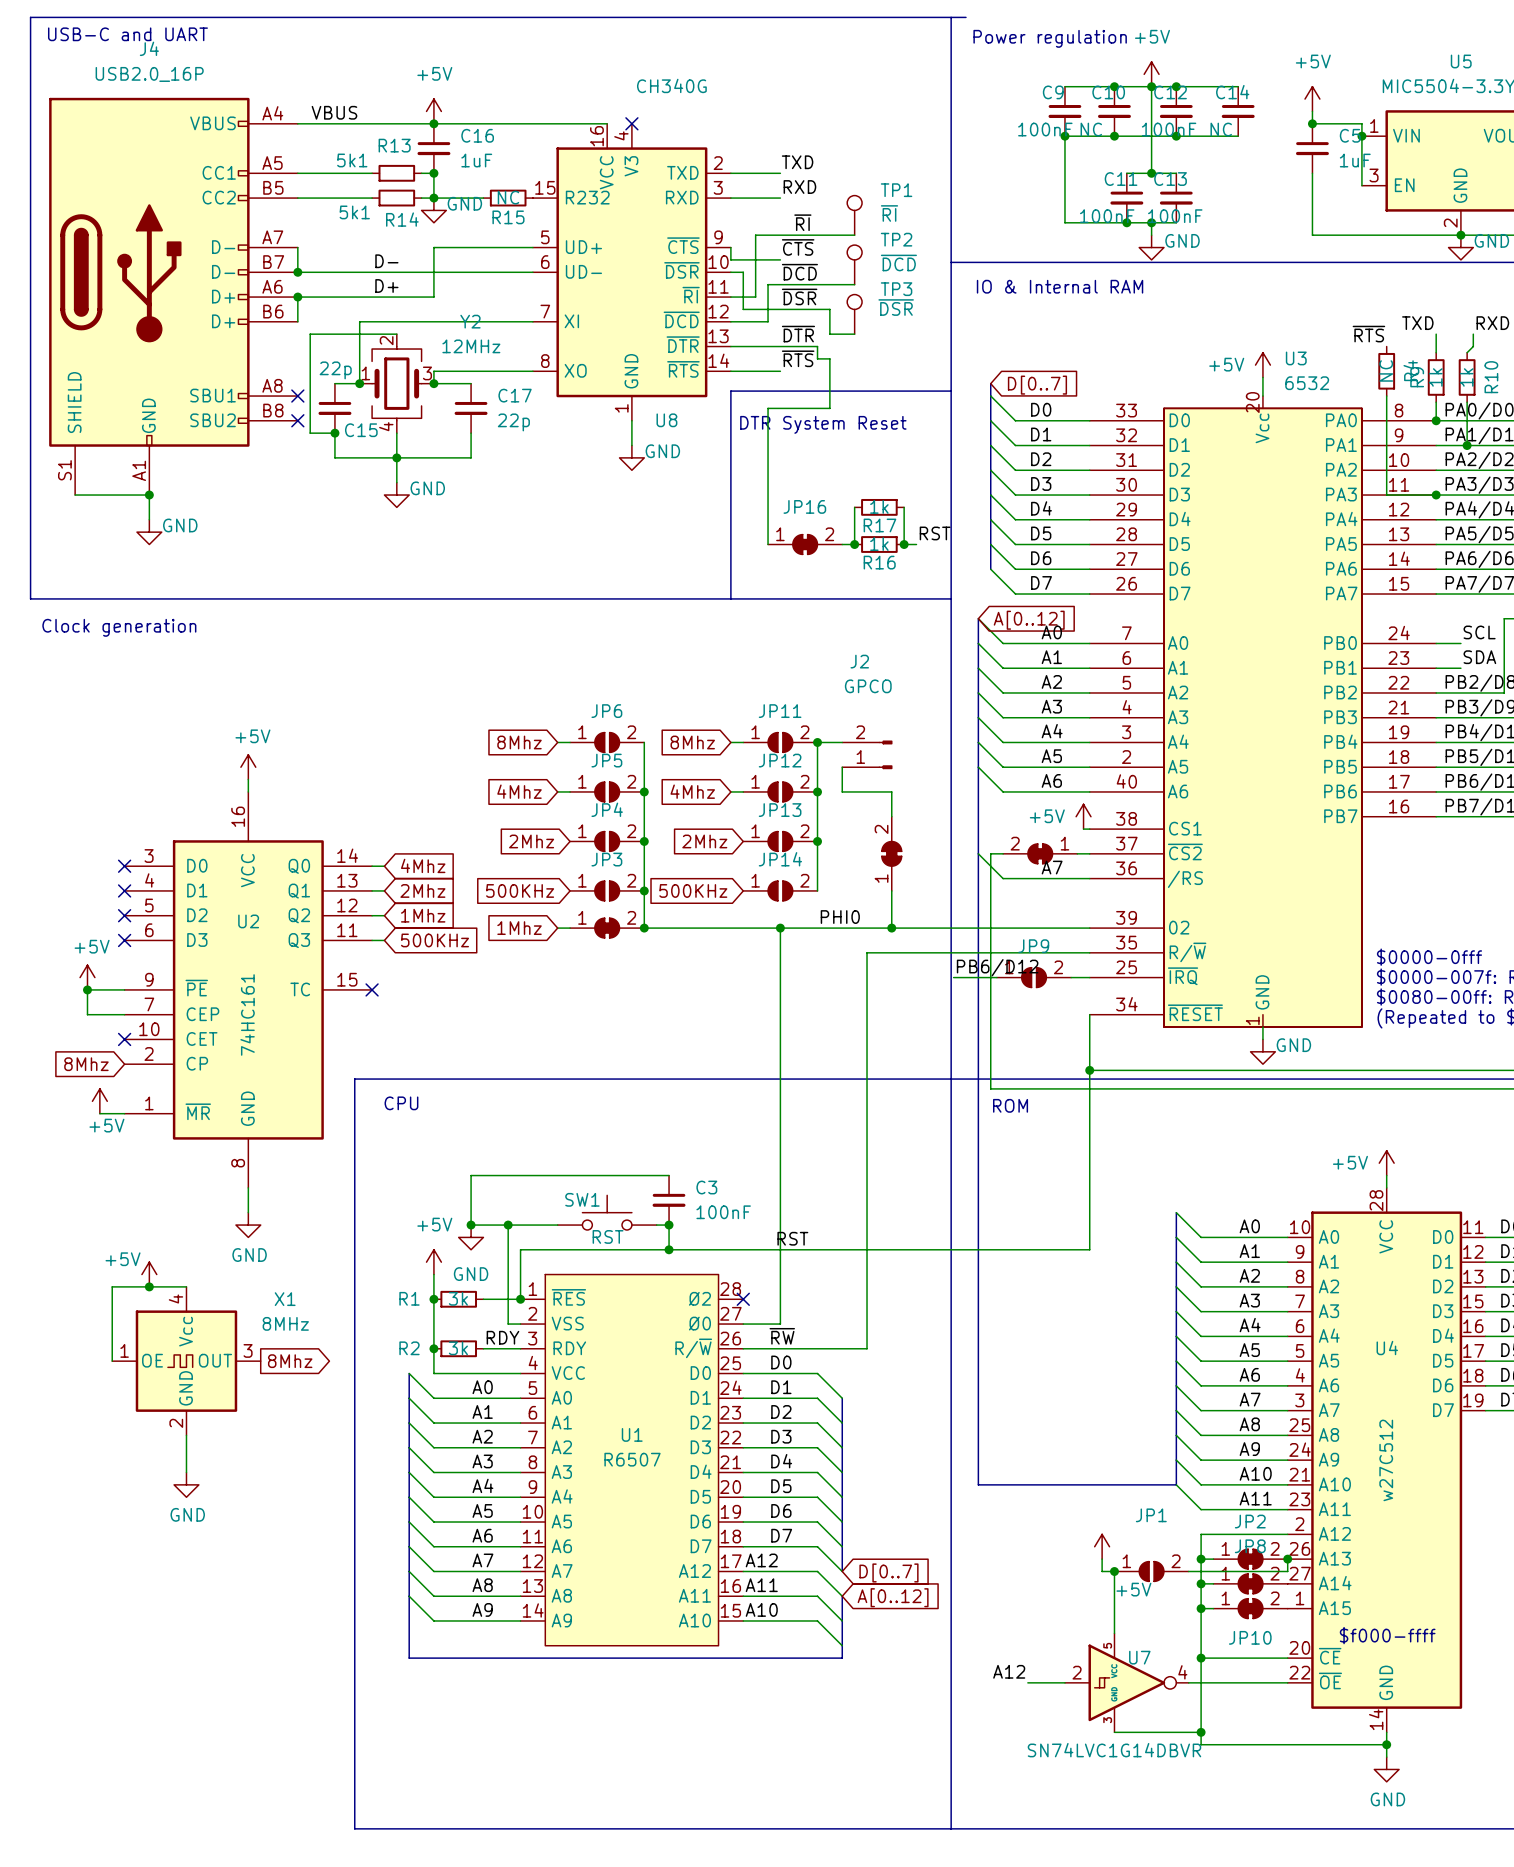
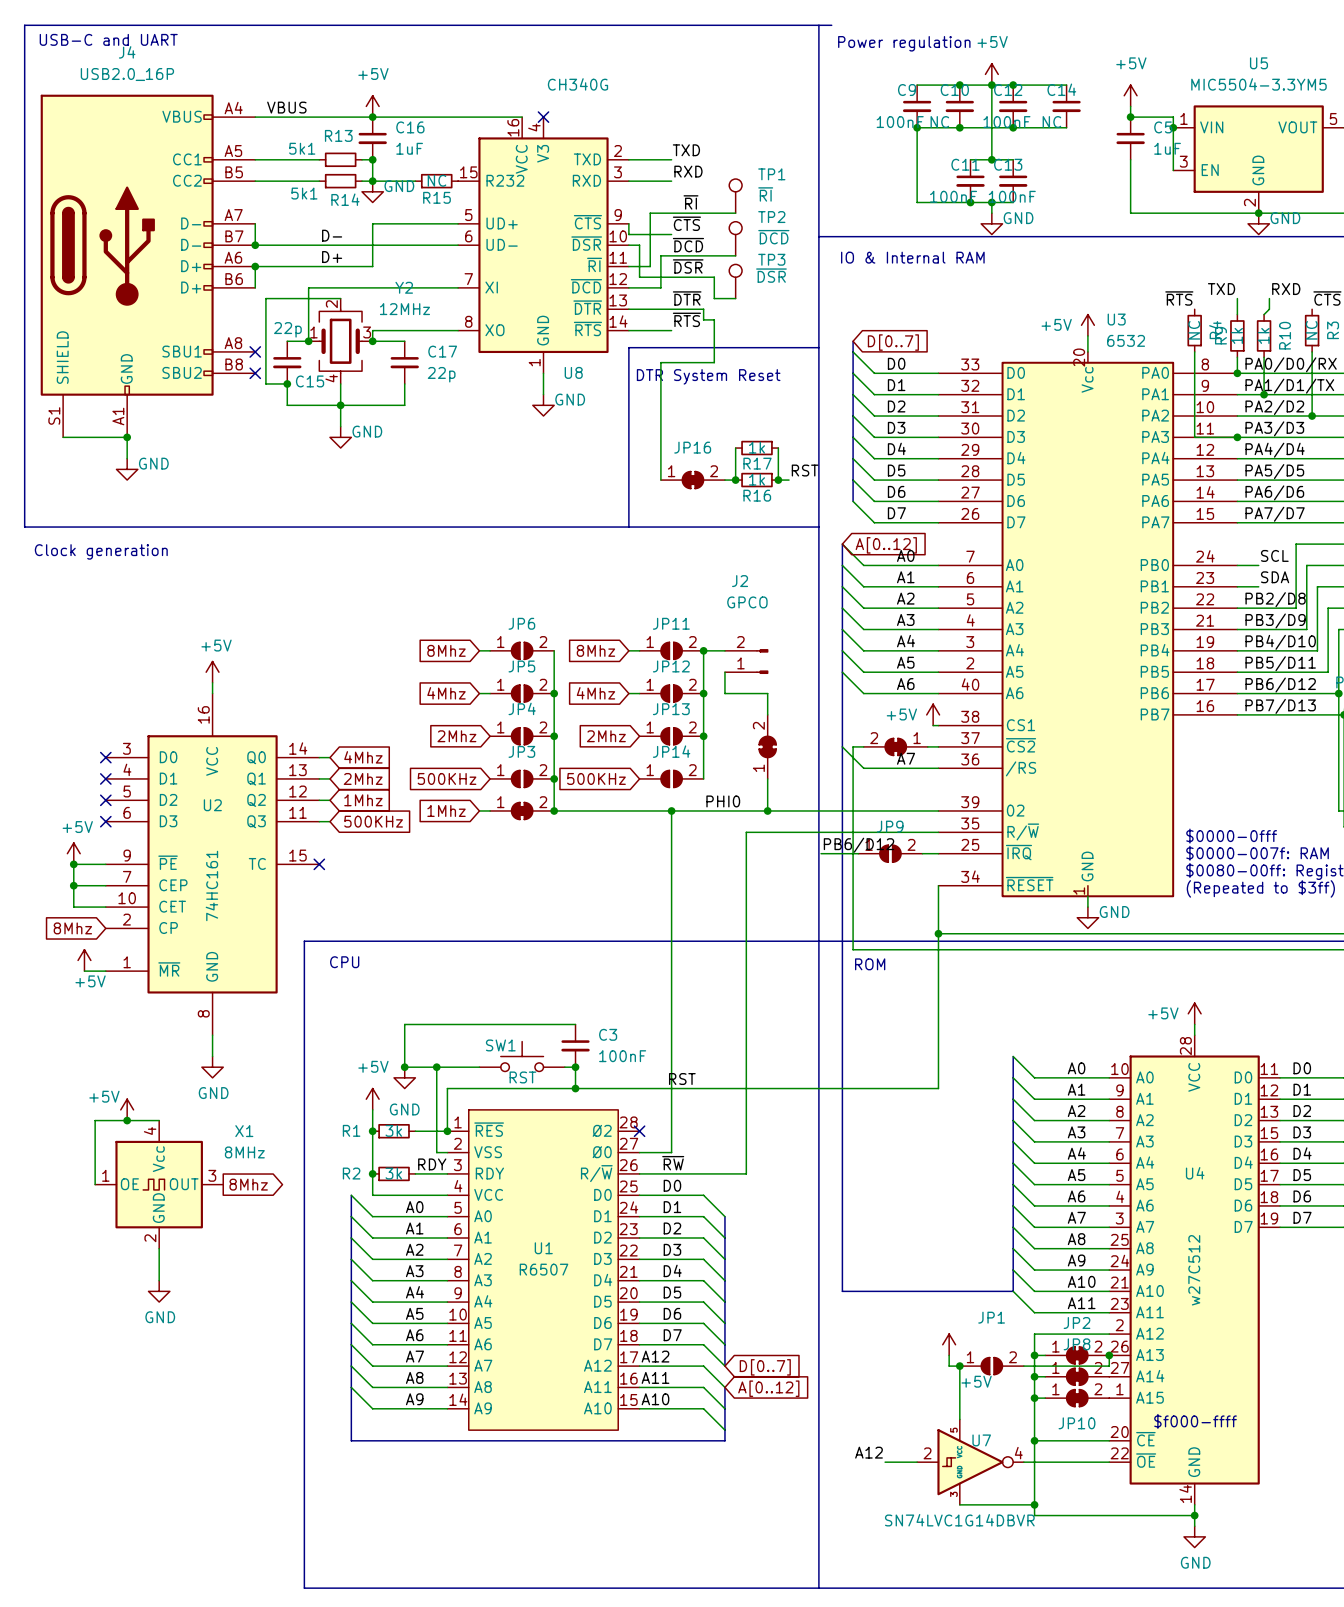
wire: none -> (73, 885) (73, 907) (105, 907)
junction: none -> (73, 885)
no-connect mark: (124, 1039) -> none

